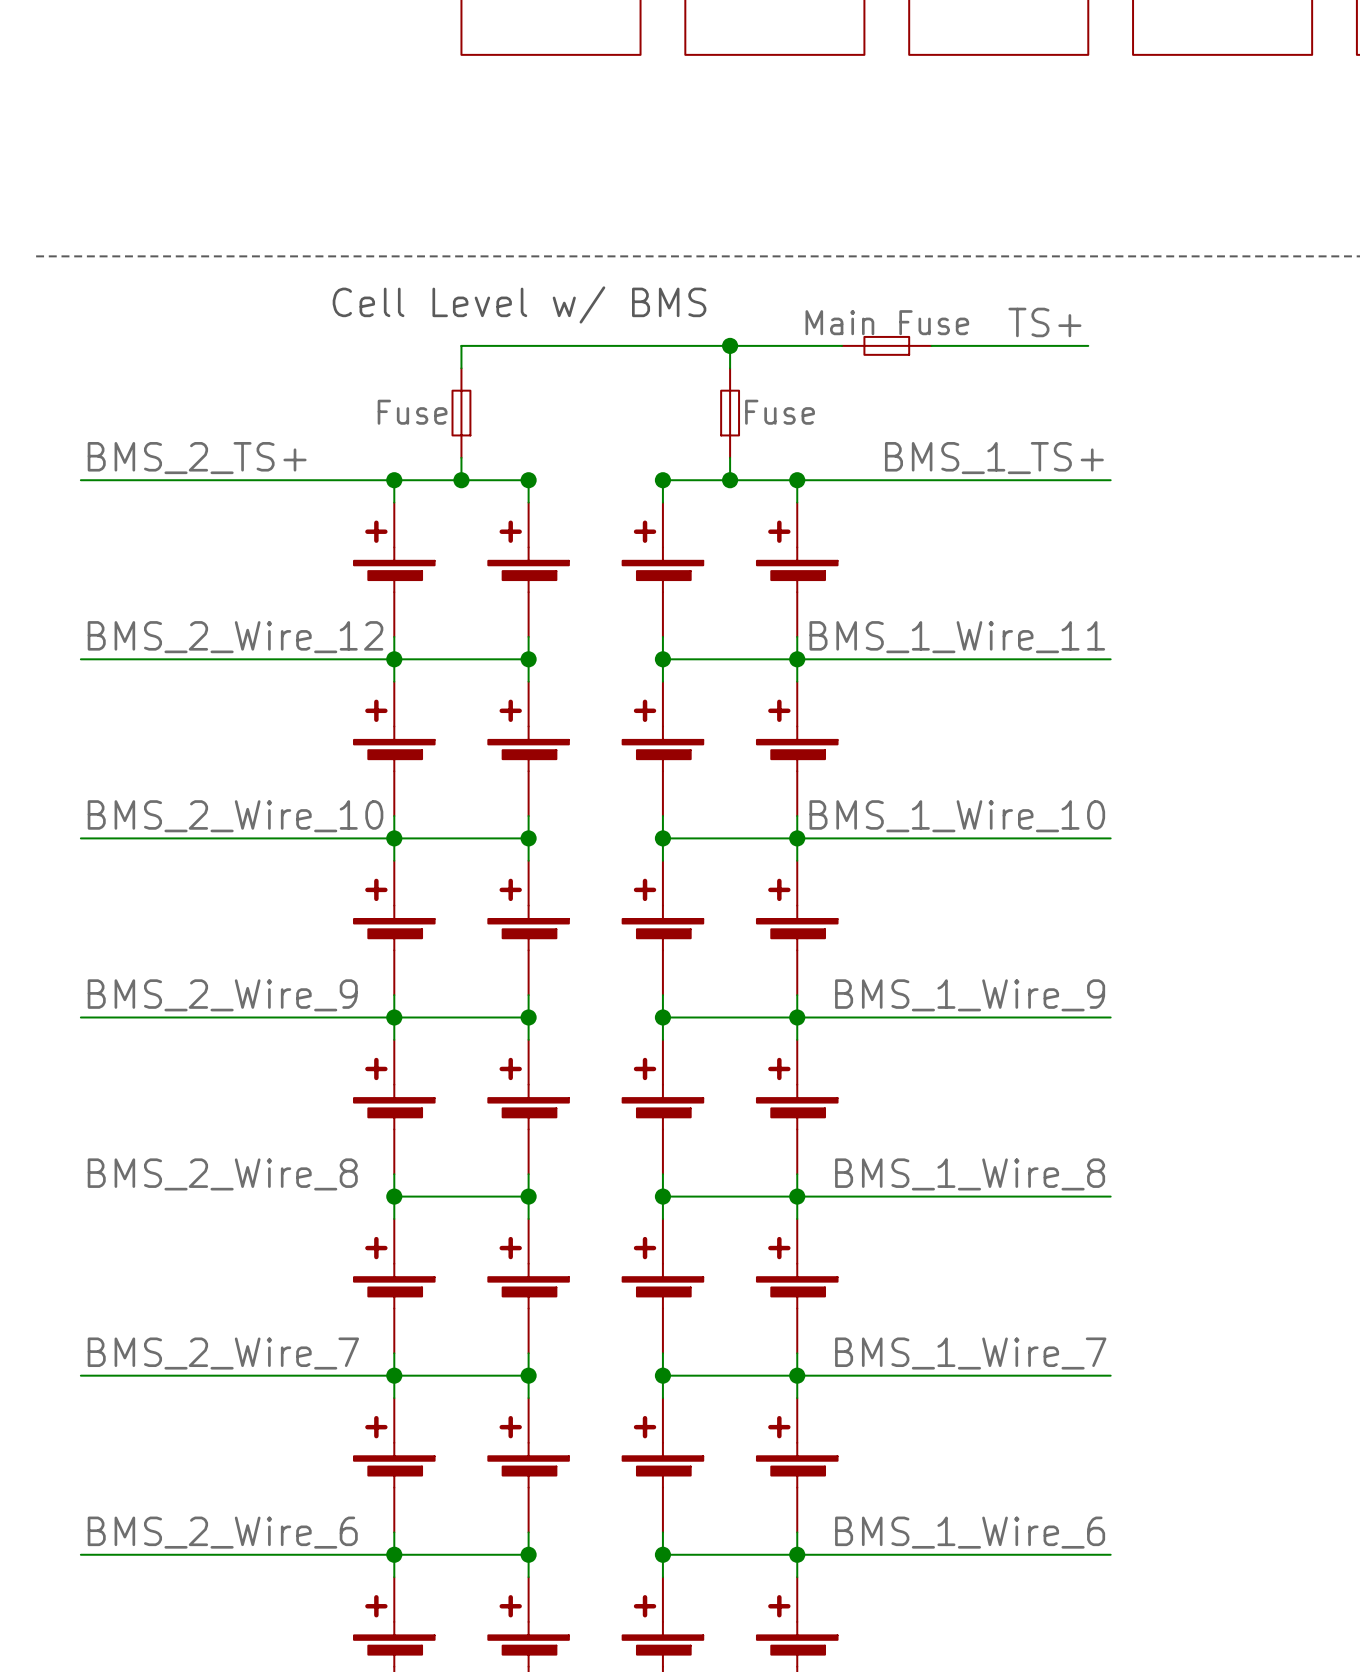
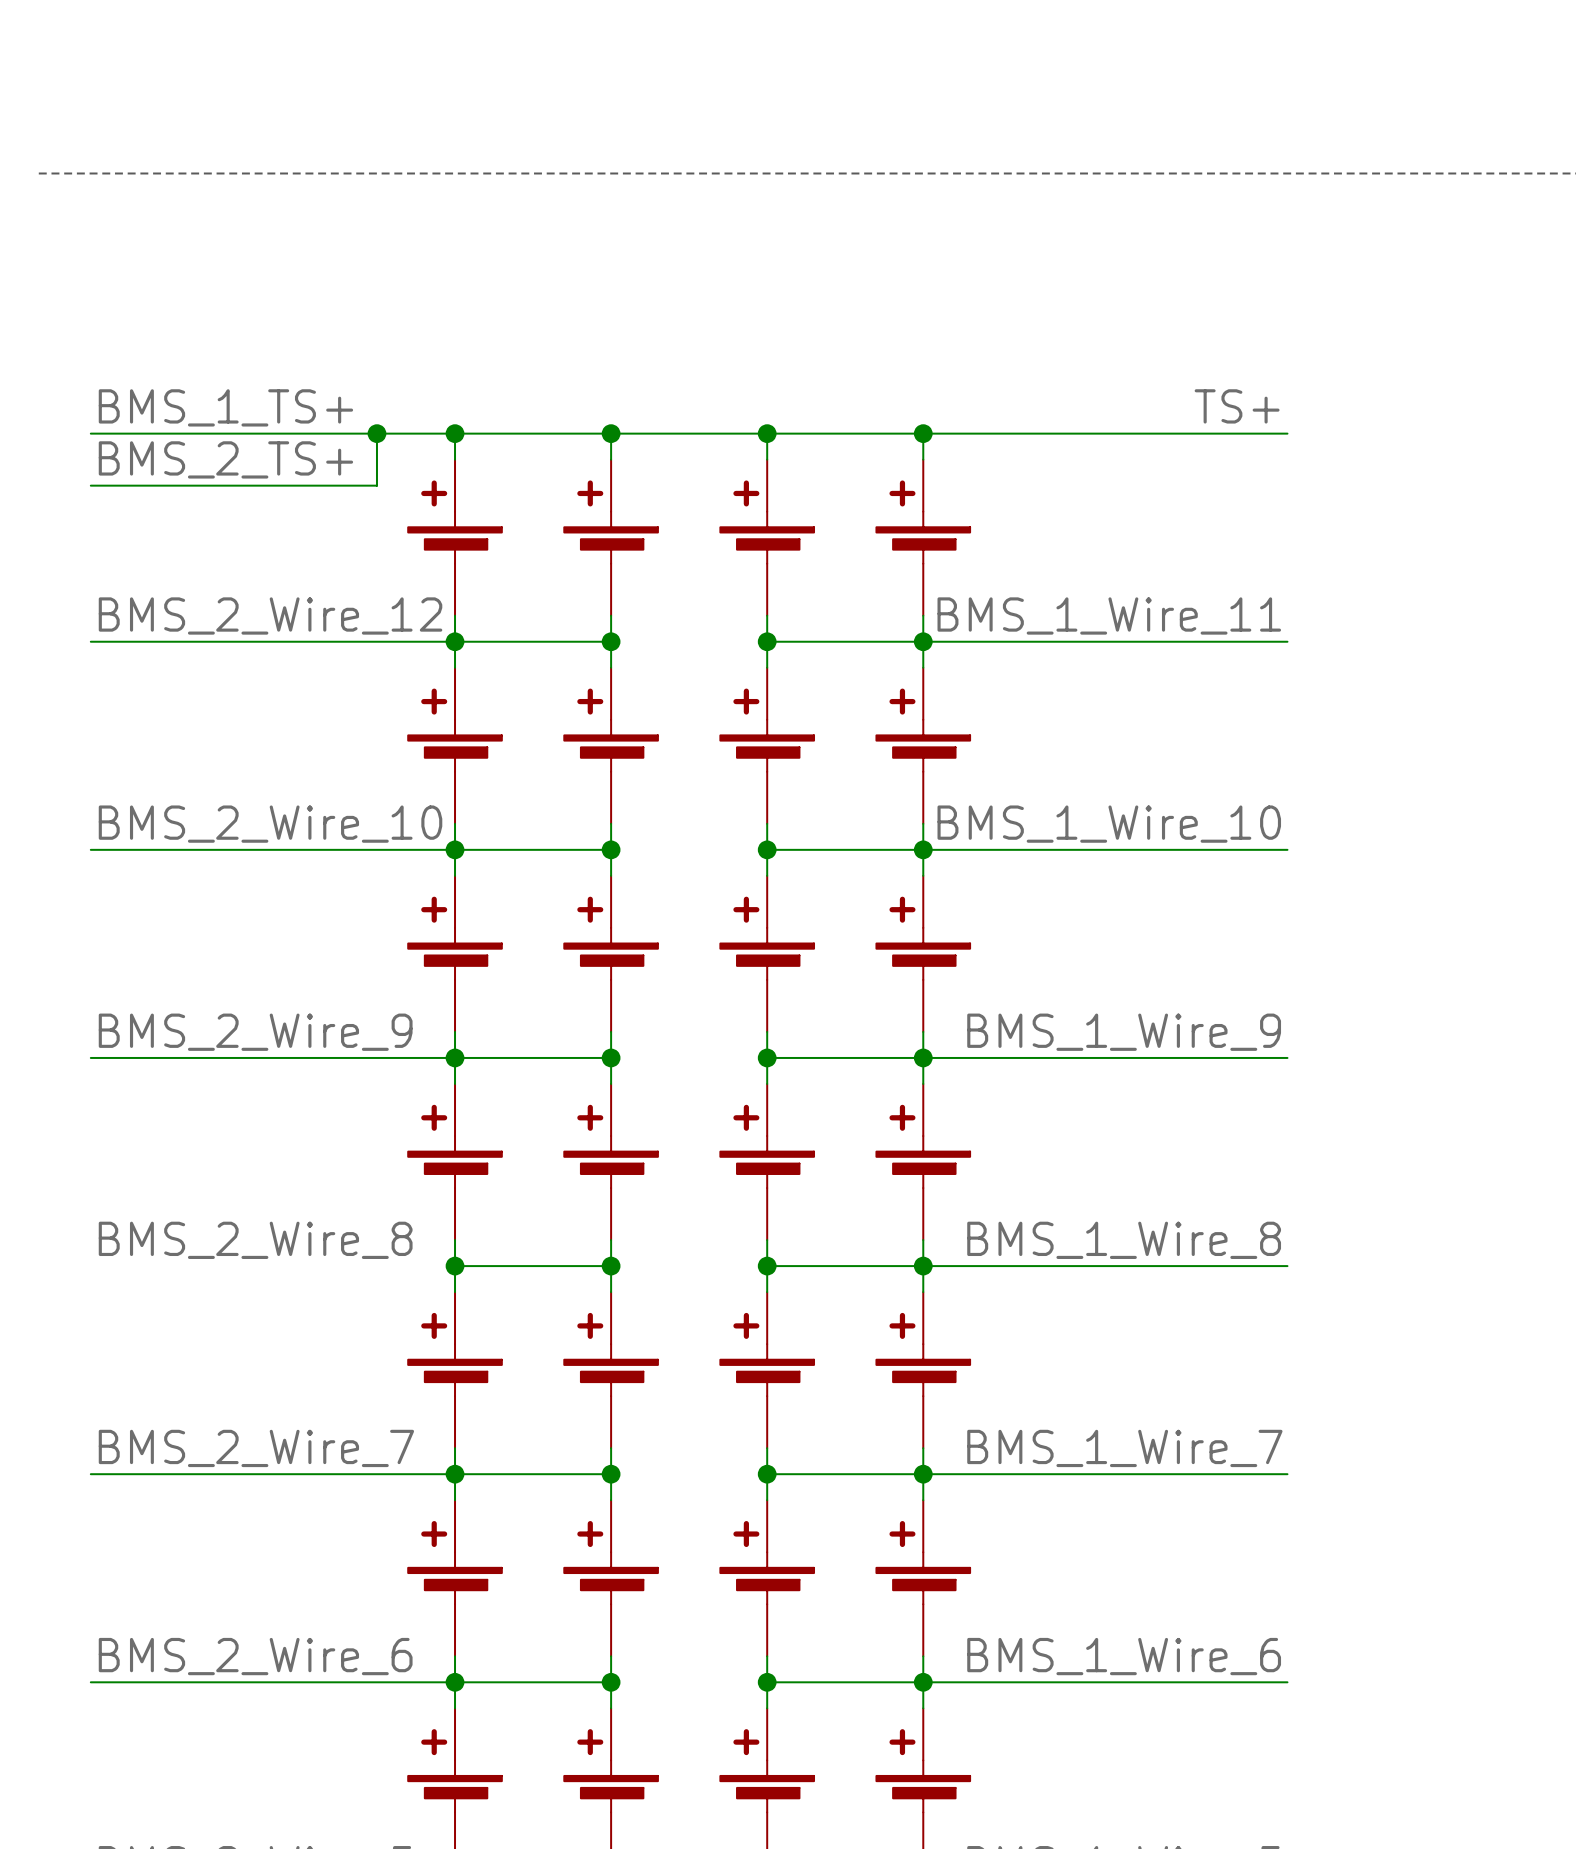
text: Cell Level w/ BMS (519, 304) -> none
label: TS+ (1044, 322) -> none
wire: (730, 345) (730, 368) -> none
junction: (730, 345) -> none
wire: (842, 345) (461, 345) (461, 368) -> none
part: Main Fuse (886, 345) -> none
wire: (931, 345) (1088, 345) -> none
part: Fuse (461, 413) -> none
part: Fuse (730, 413) -> none
wire: (461, 457) (461, 480) -> none
wire: (730, 457) (730, 480) -> none
label: BMS_2_TS+ (197, 458) -> BMS_1_TS+ (225, 407)
label: BMS_1_TS+ (994, 458) -> TS+ (1237, 406)
wire: none -> (376, 433) (376, 485) (90, 485)
junction: none -> (376, 433)
junction: (461, 480) -> none
wire: none -> (611, 433) (767, 433)
junction: (730, 480) -> none
label: none -> BMS_2_TS+ (225, 459)

